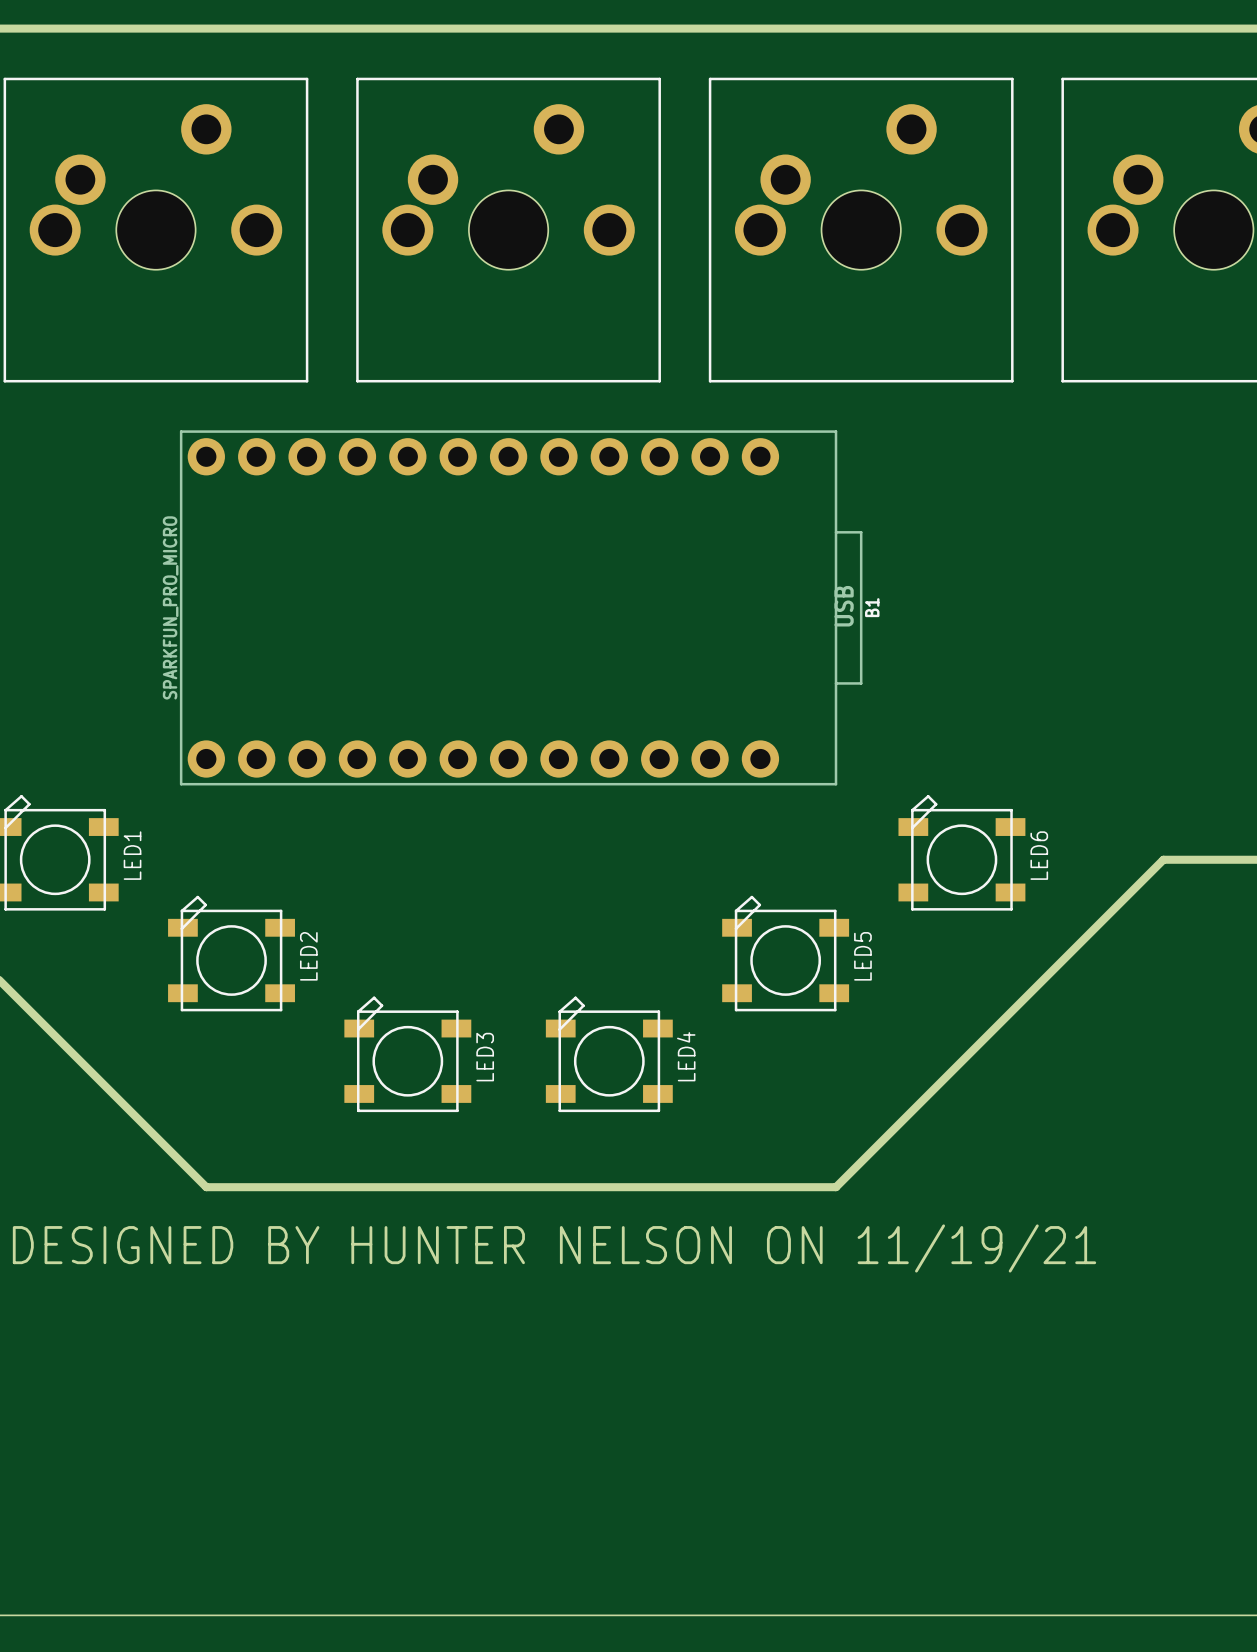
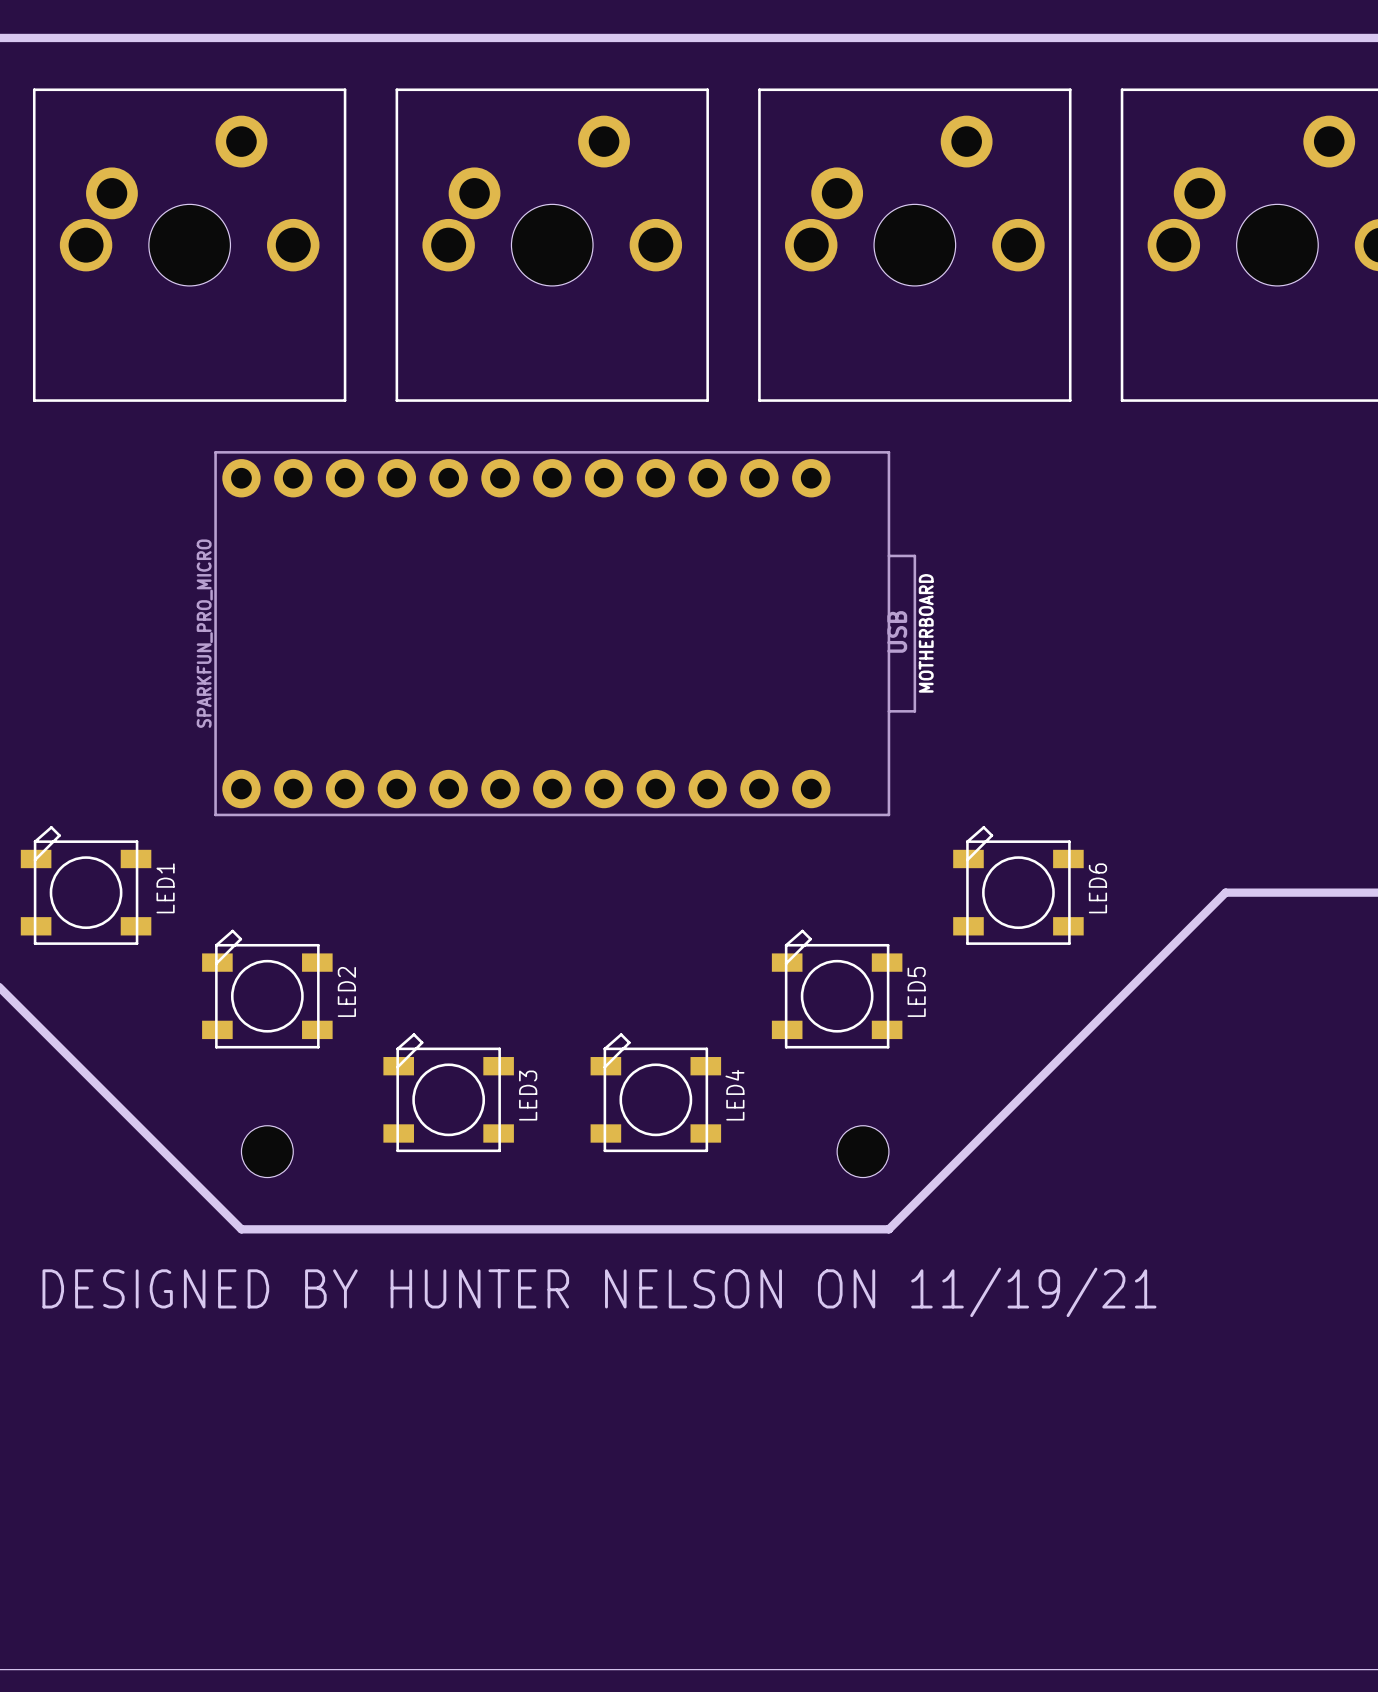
B1 name: B1 (872, 607) -> MOTHERBOARD (926, 633)
hole: none -> (267, 1151)
hole: none -> (863, 1151)

